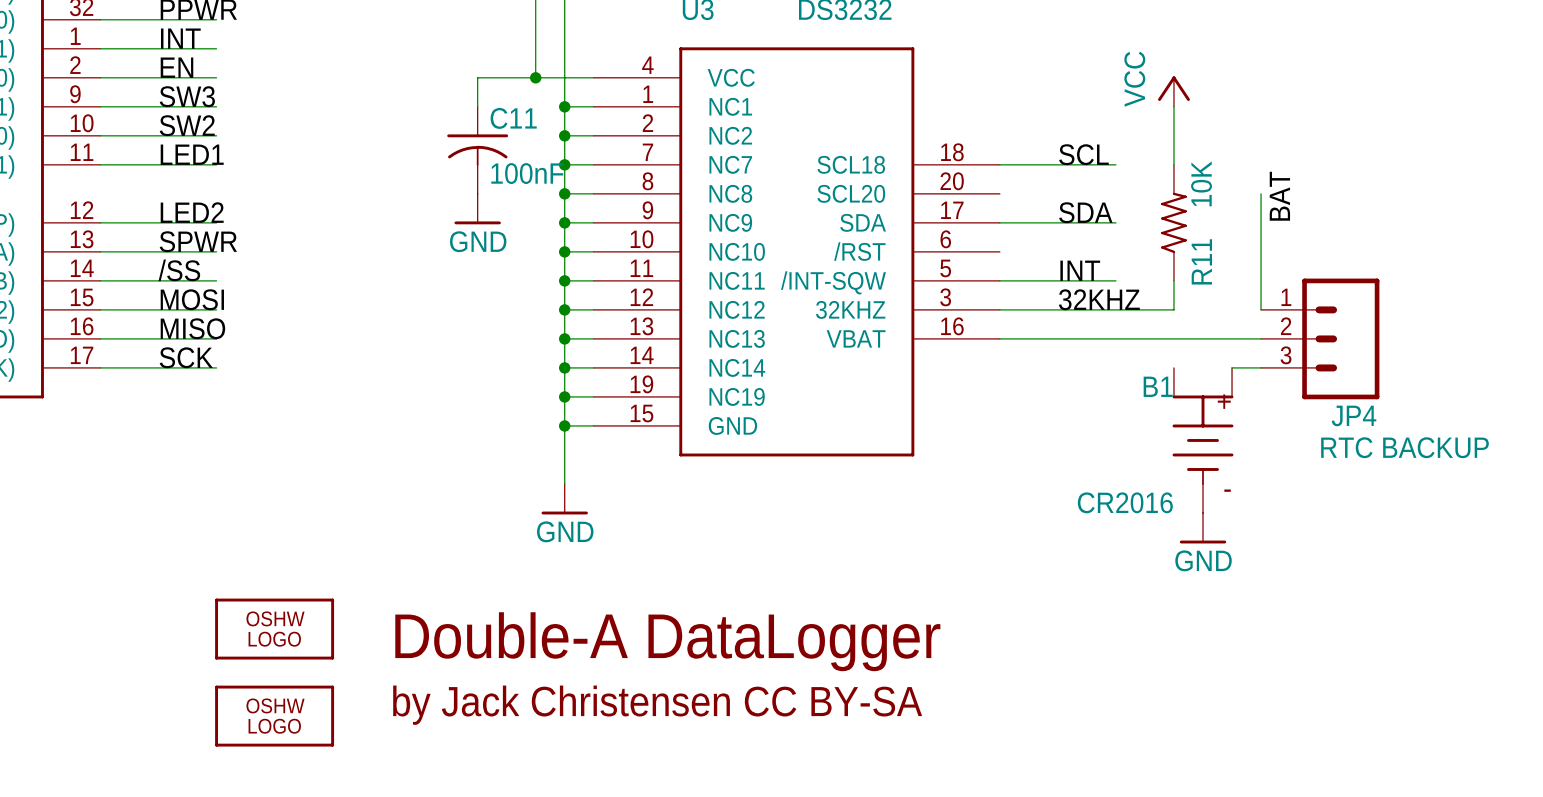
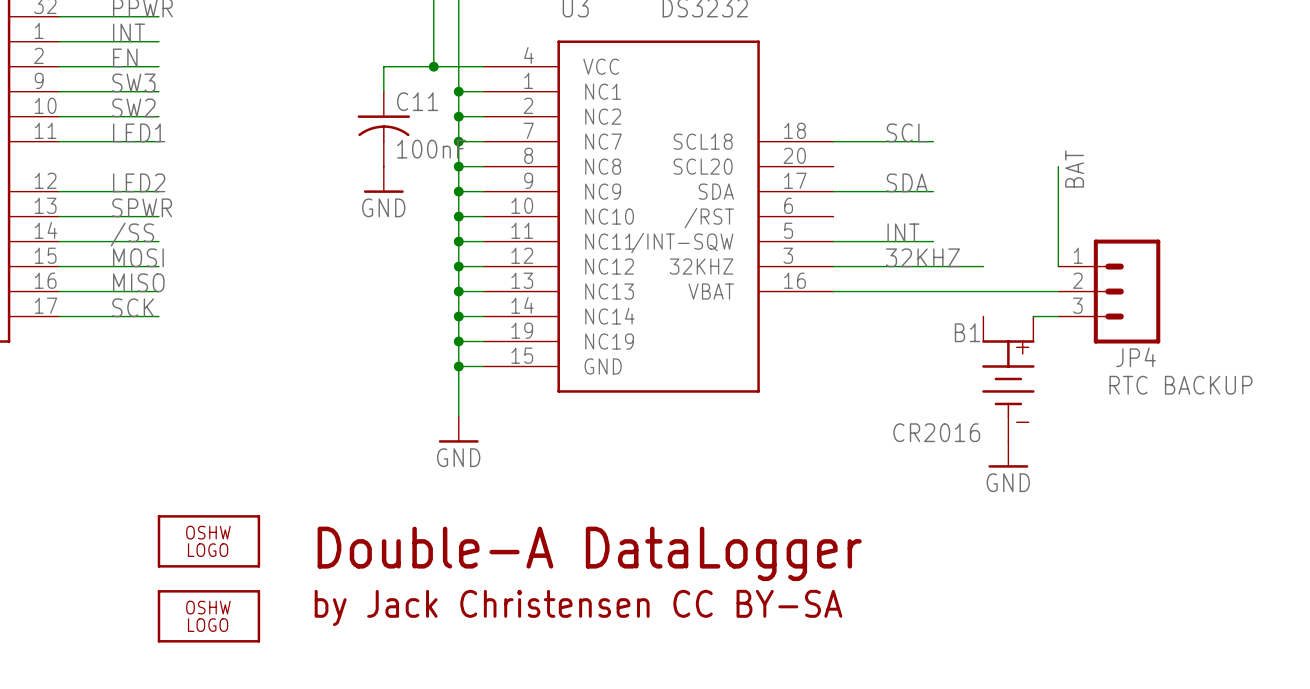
power symbol: VCC (1173, 91) -> none
wire: (1173, 106) (1173, 164) -> none
R11: 10K (1173, 222) -> none
wire: (1173, 280) (1173, 309) -> none

